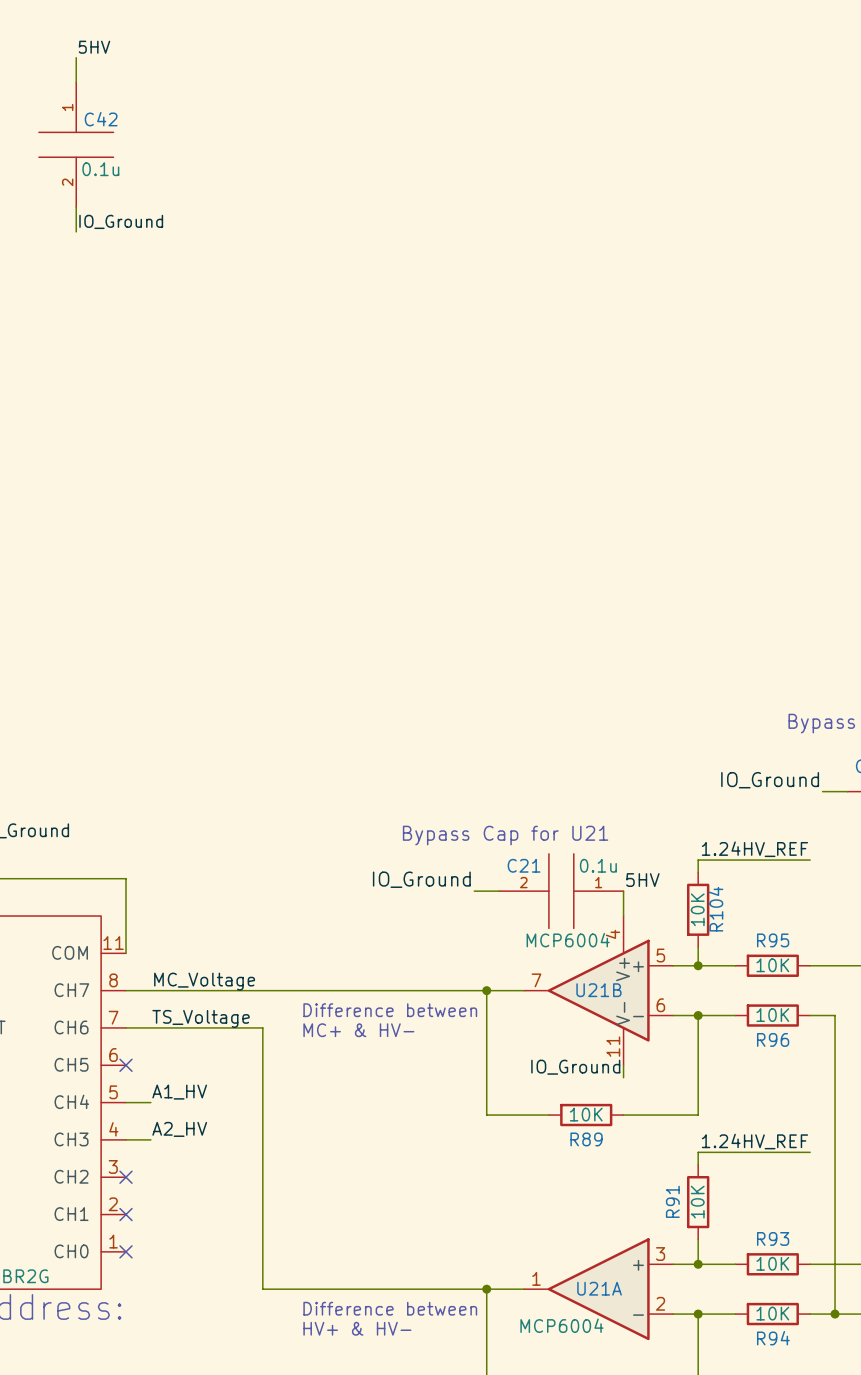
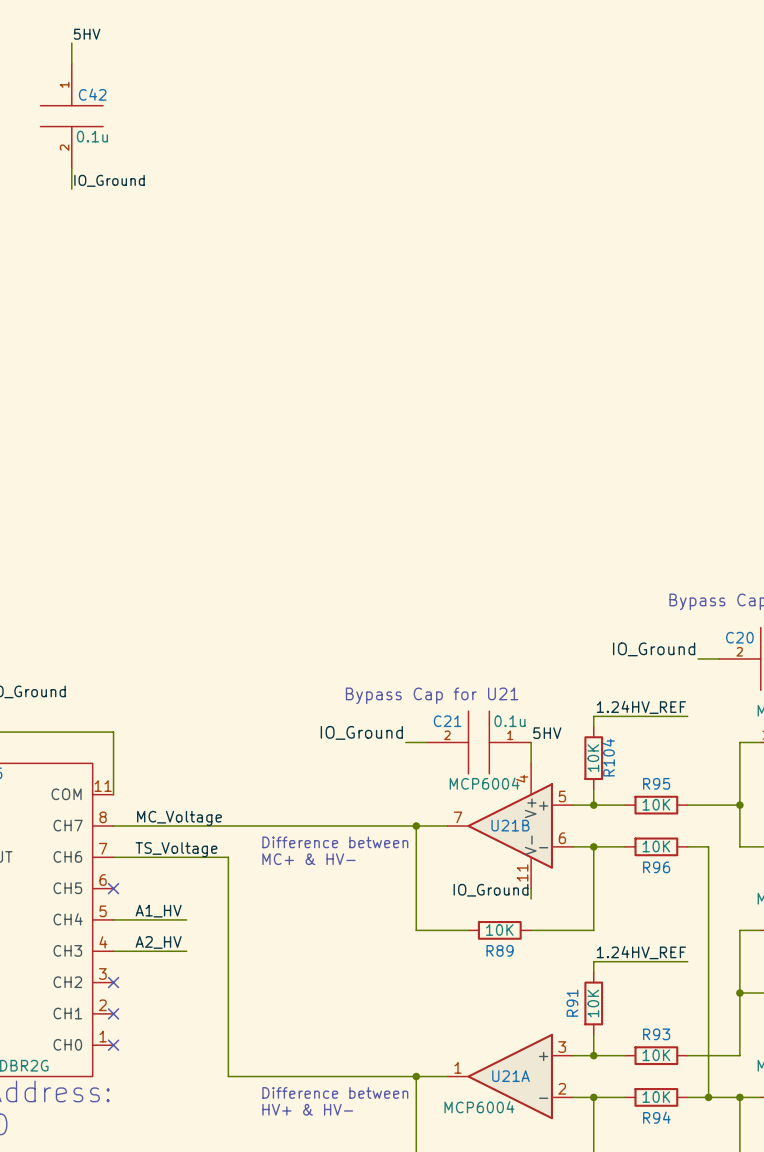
wire: none -> (134, 919) (186, 919)
wire: none -> (134, 951) (186, 951)

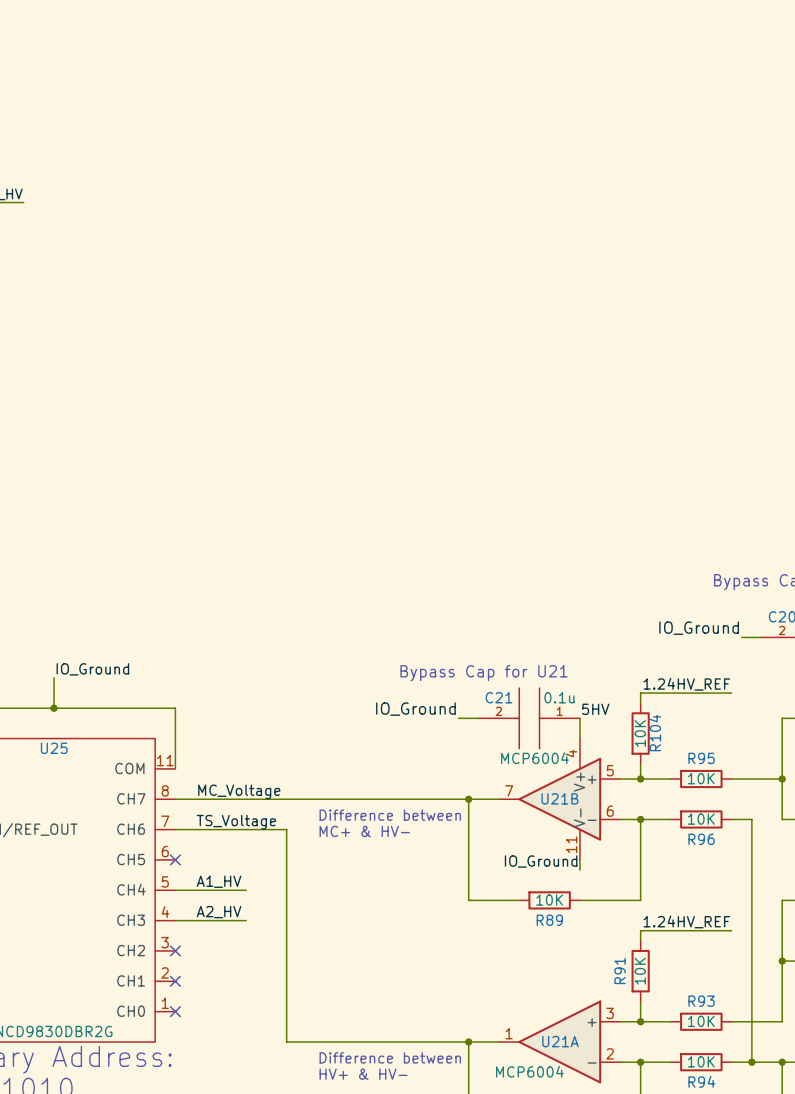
label: 5HV (87, 34) -> none
wire: (71, 43) (71, 63) -> none
C42: 0.1u (71, 116) -> none
wire: (71, 168) (71, 189) -> none
label: IO_Ground (109, 180) -> none

